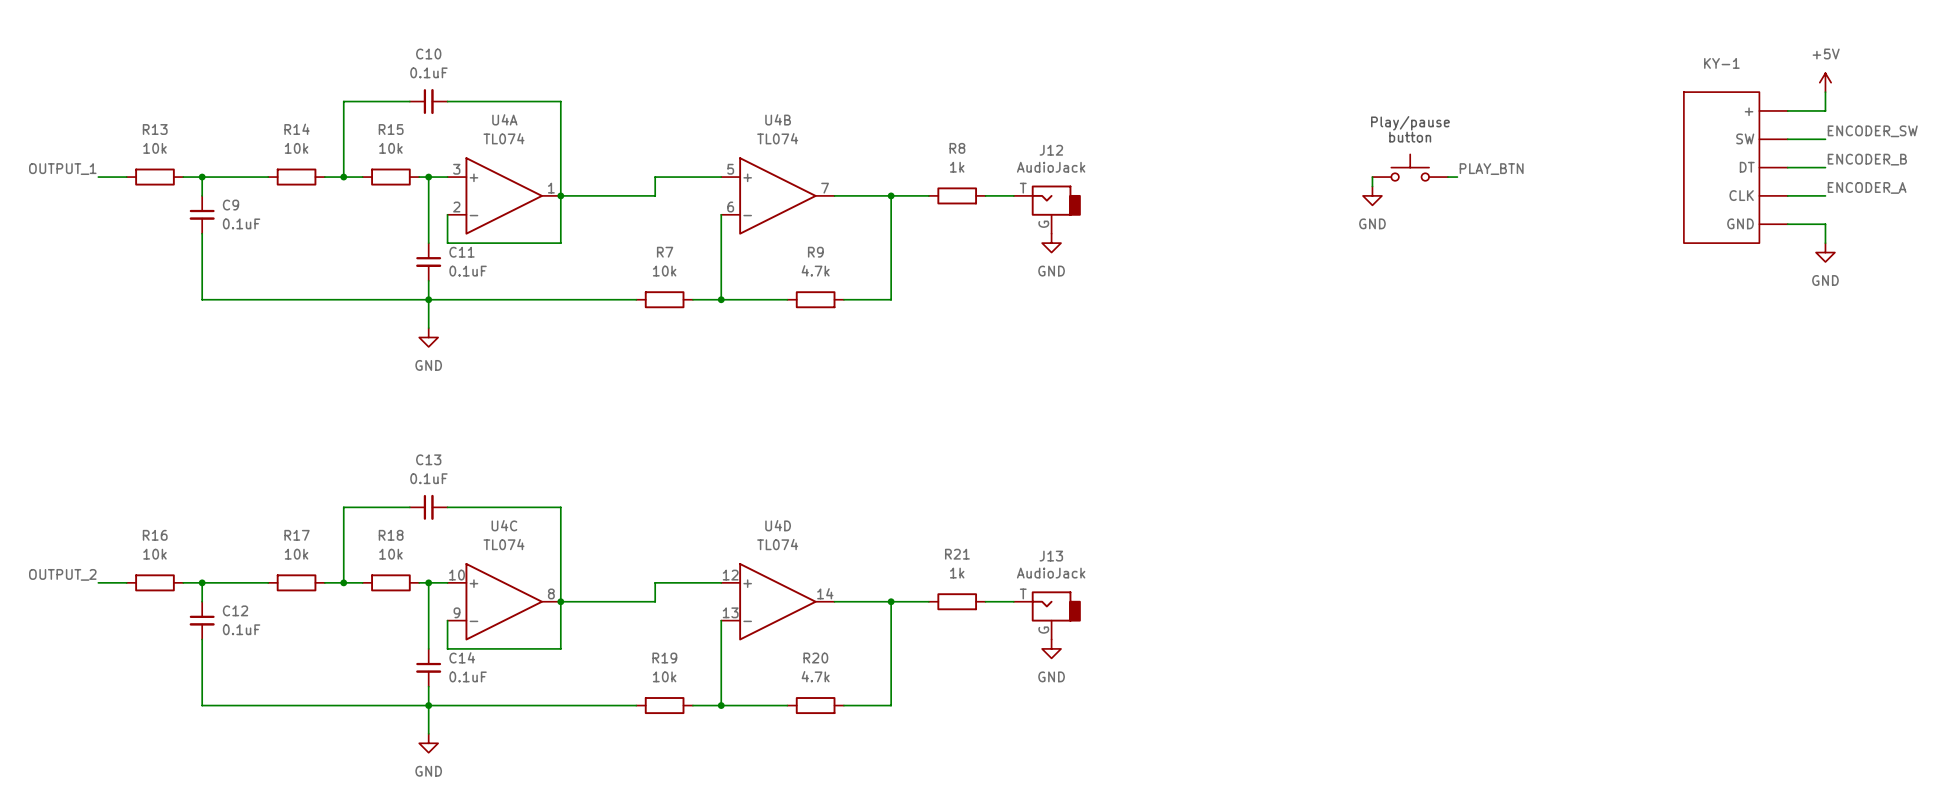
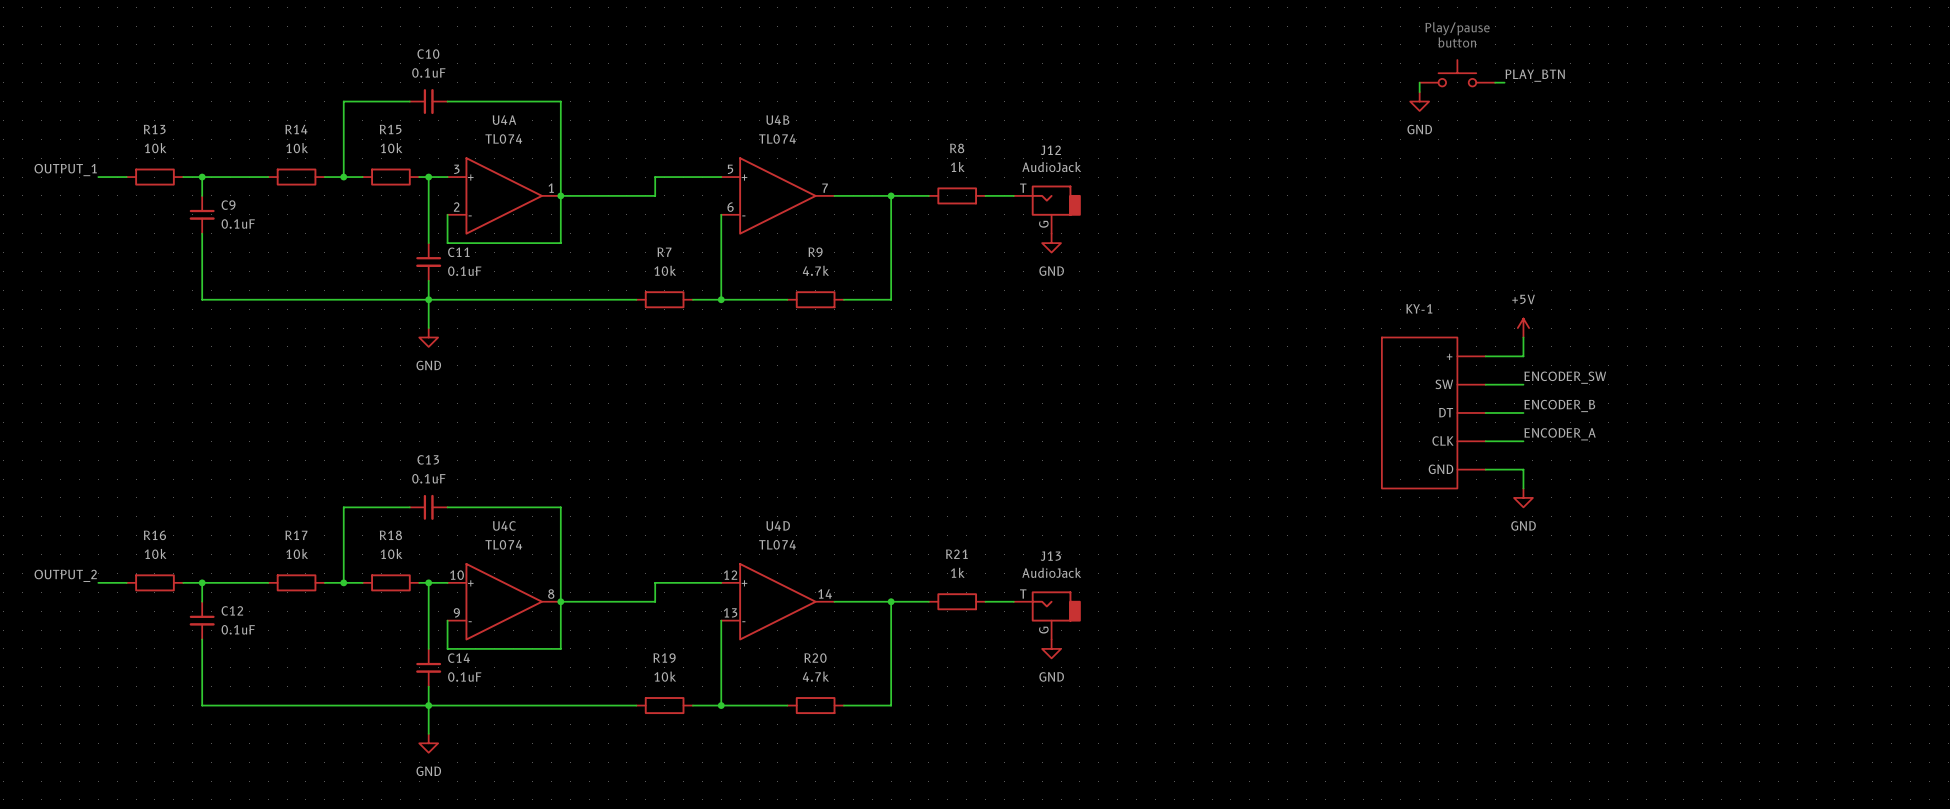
power symbol: +5V (1825, 82) -> none
wire: (1825, 92) (1825, 110) (1787, 110) -> none
text position: Play/pause (1410, 123) -> Play/pause (1457, 28)
label: ENCODER_SW (1872, 131) -> none
text position: button (1410, 137) -> button (1457, 42)
wire: (1787, 139) (1825, 139) -> none
label: ENCODER_B (1867, 159) -> none
part position: (1410, 167) -> (1457, 73)
KY-1 position: (1735, 167) -> (1433, 412)
wire: (1787, 167) (1825, 167) -> none
label position: PLAY_BTN (1491, 169) -> PLAY_BTN (1535, 75)
wire: (1372, 177) (1372, 186) -> (1419, 82) (1419, 92)
wire: (1447, 177) (1457, 177) -> (1495, 82) (1504, 82)
label: ENCODER_A (1867, 187) -> none
power symbol position: GND (1372, 195) -> GND (1419, 101)
wire: (1787, 195) (1825, 195) -> none
wire: (1787, 224) (1825, 224) (1825, 243) -> none
power symbol: GND (1825, 252) -> none
power symbol: none -> +5V (1523, 328)
wire: none -> (1523, 337) (1523, 356) (1485, 356)
label: none -> ENCODER_SW (1565, 377)
wire: none -> (1485, 384) (1523, 384)
label: none -> ENCODER_B (1559, 405)
wire: none -> (1485, 412) (1523, 412)
label: none -> ENCODER_A (1560, 434)
wire: none -> (1485, 441) (1523, 441)
wire: none -> (1485, 469) (1523, 469) (1523, 488)
power symbol: none -> GND (1523, 497)

